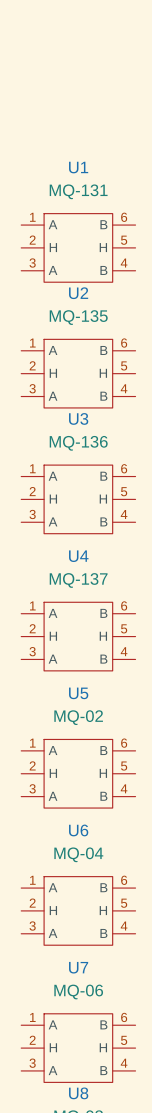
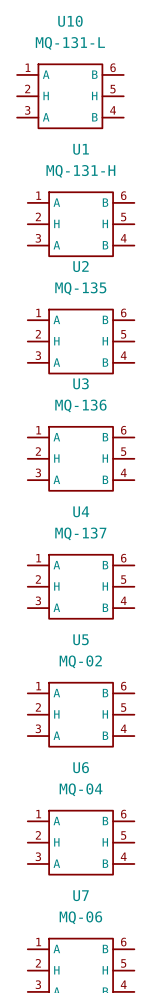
U10: none -> MQ-131-L (70, 96)
U1 value: MQ-131 (78, 191) -> MQ-131-H (80, 171)

